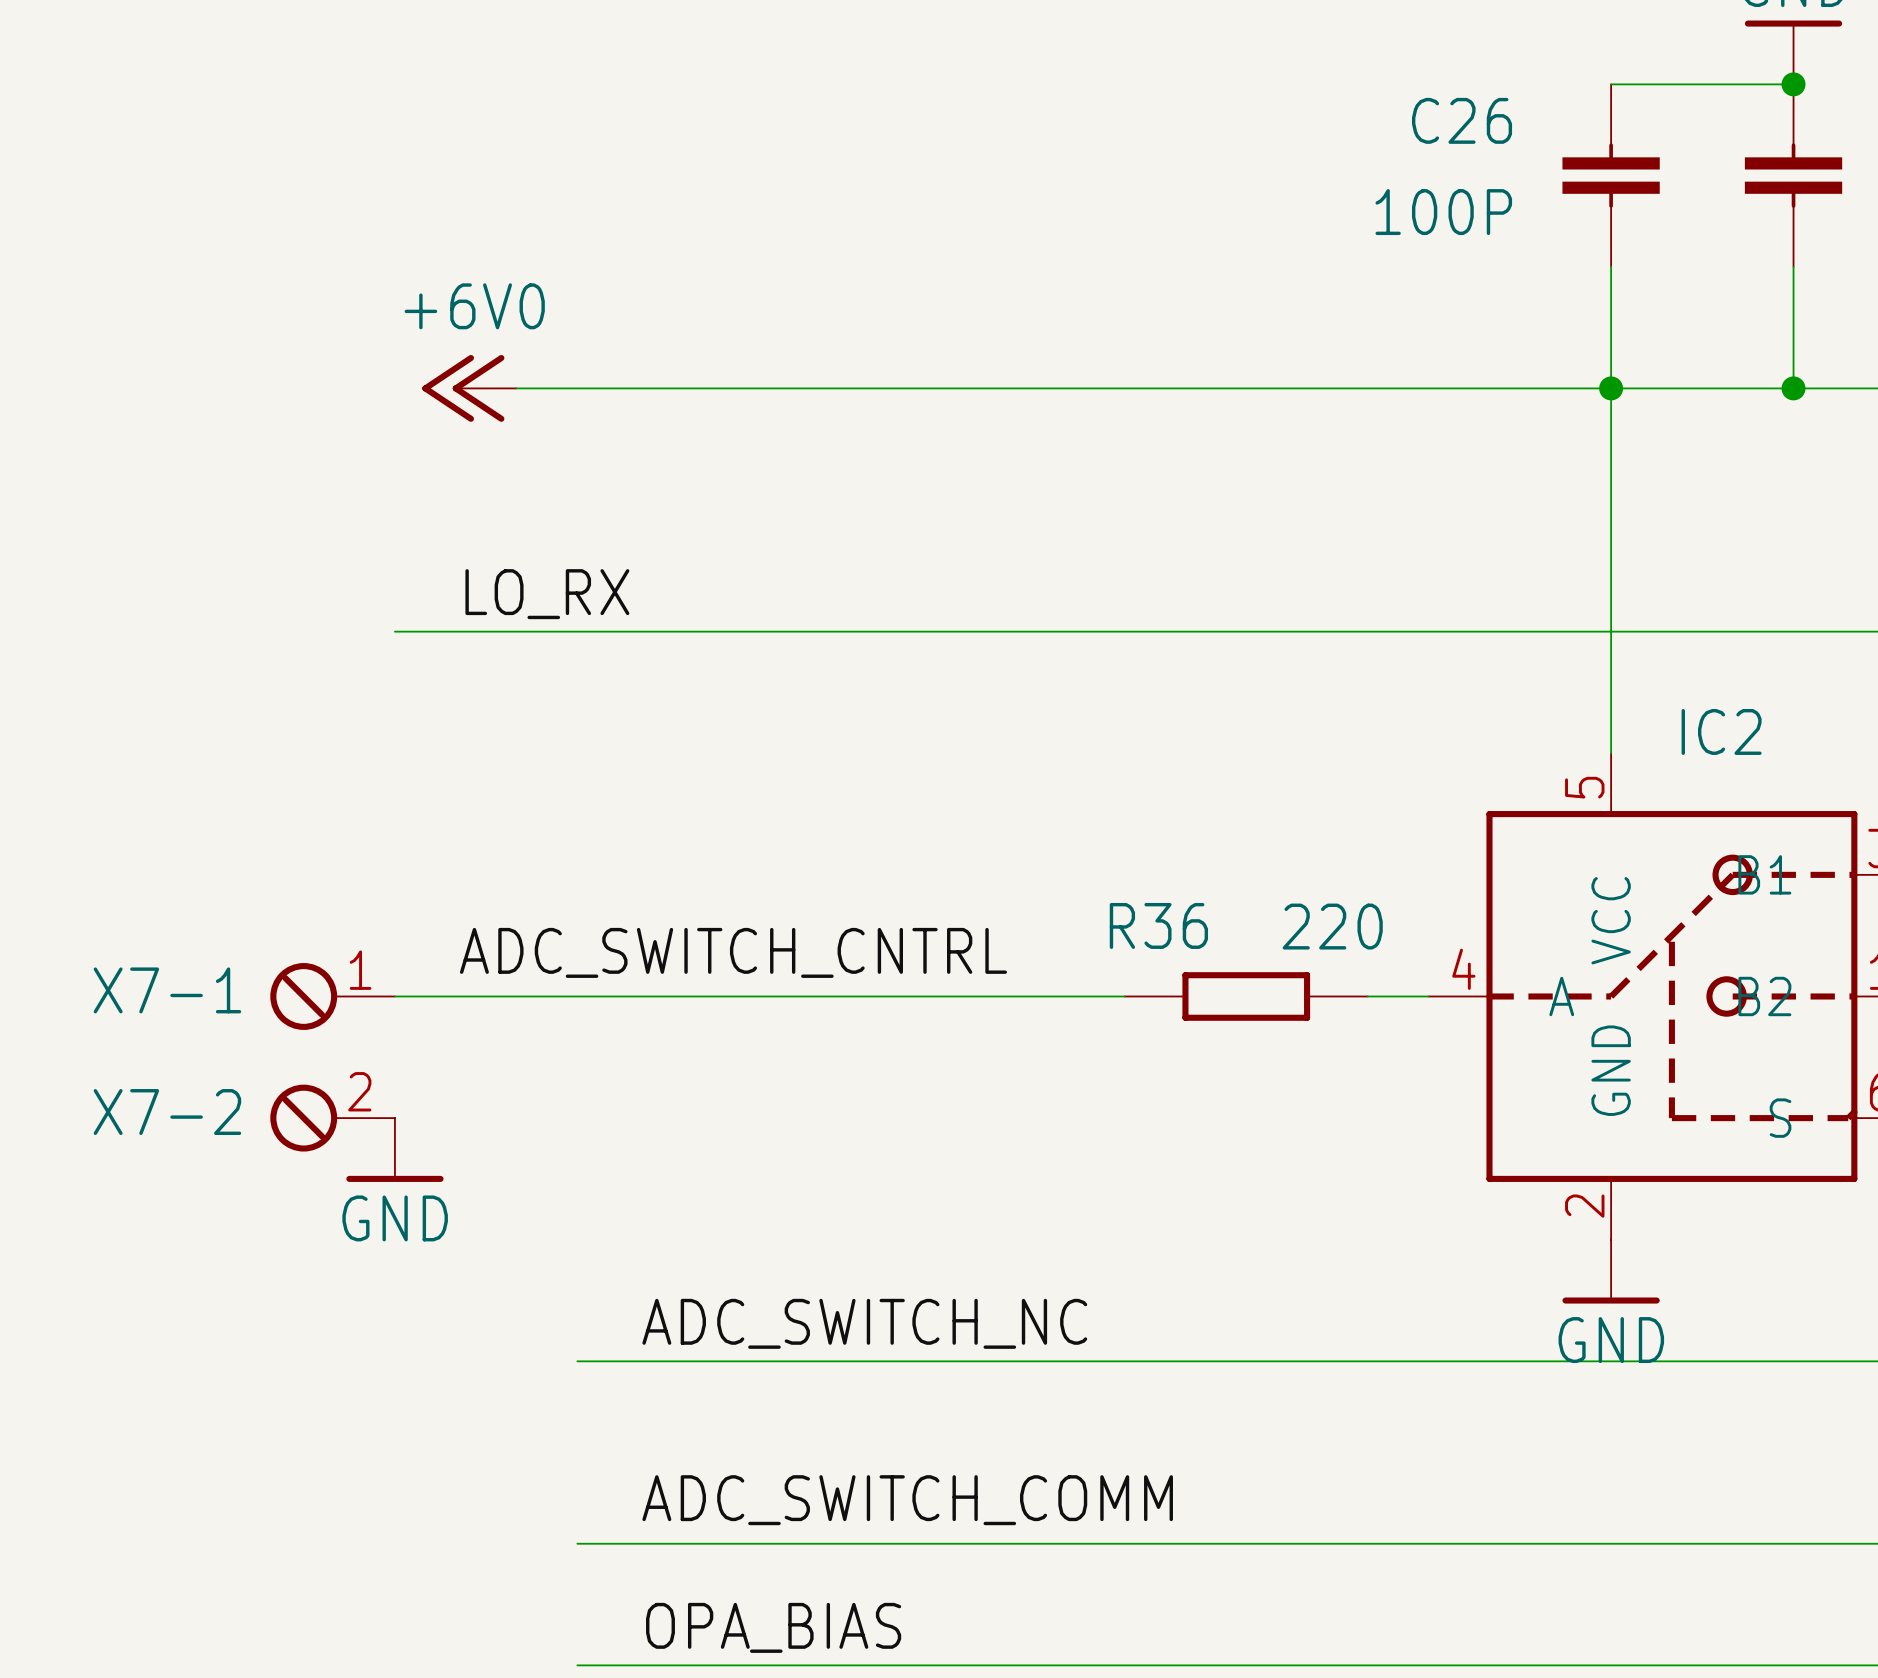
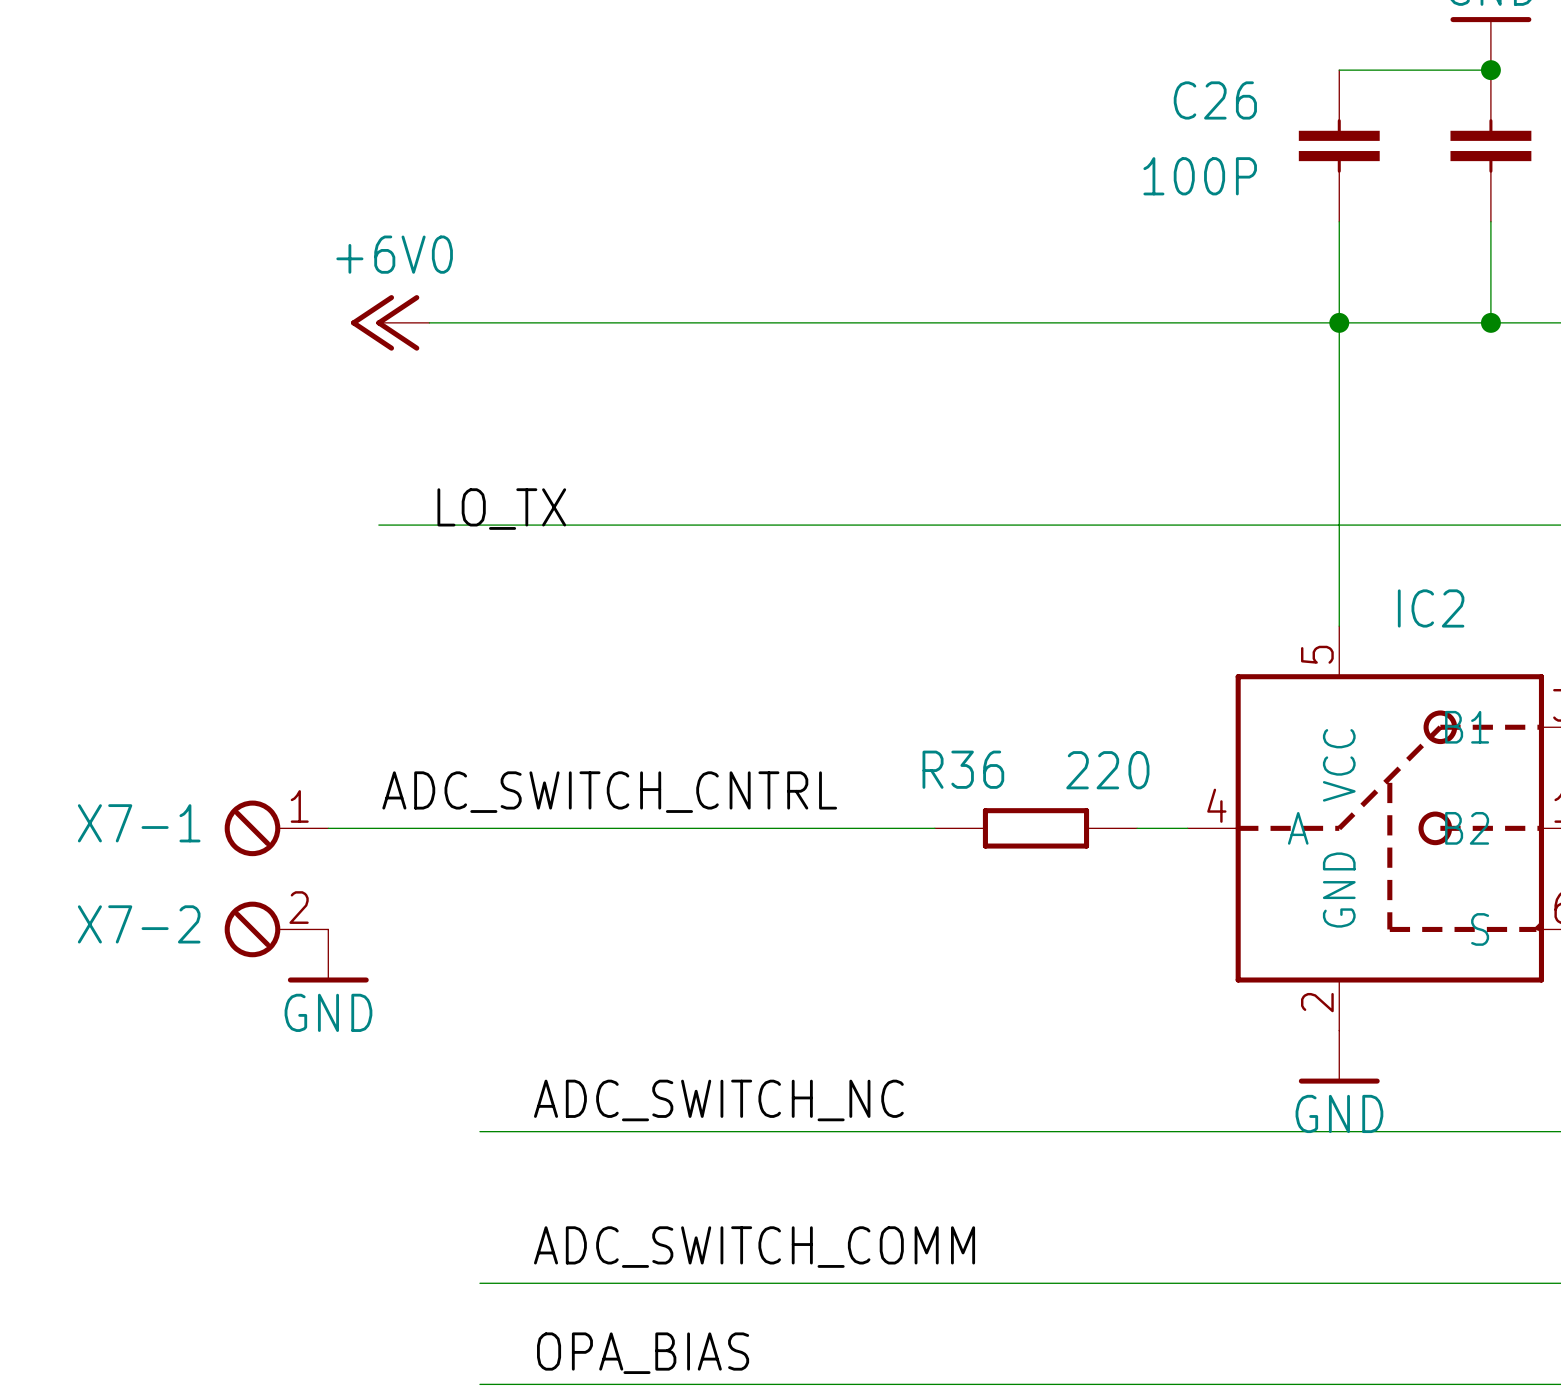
label: LO_RX (547, 594) -> LO_TX (501, 509)
wire: (394, 631) (455, 631) -> none

